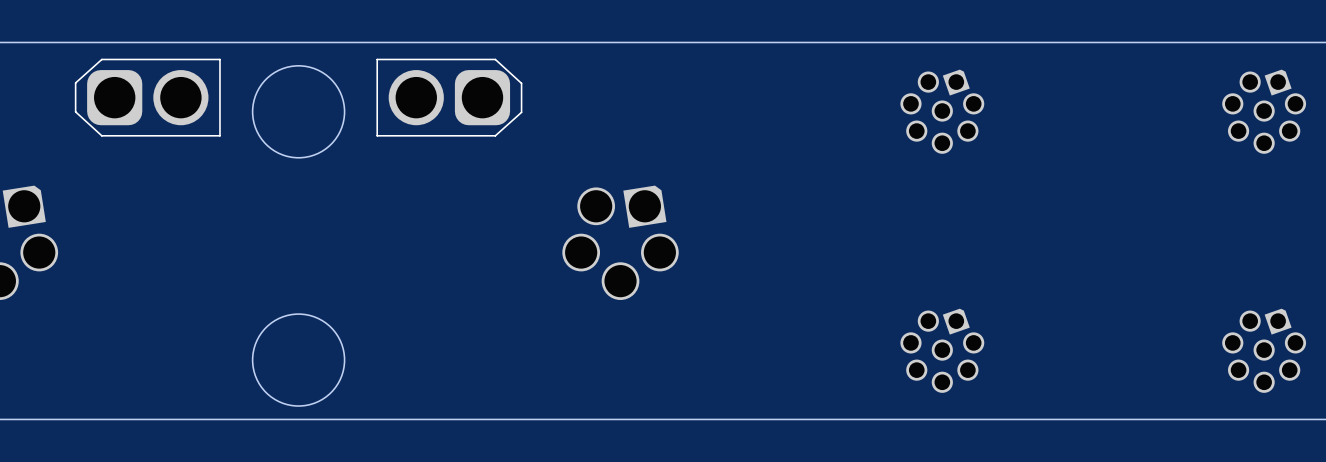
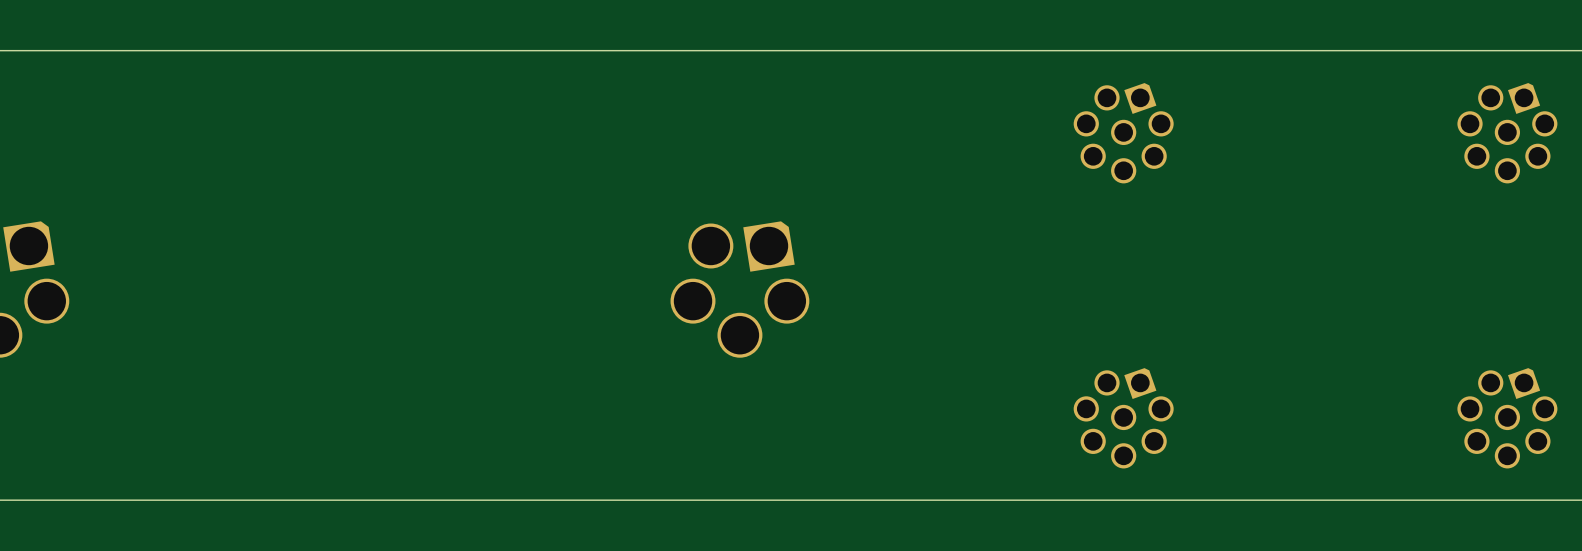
round board edge: [252, 65, 346, 159] -> none
part: (147, 97) -> none
part: (449, 97) -> none
round board edge: [252, 313, 346, 407] -> none

